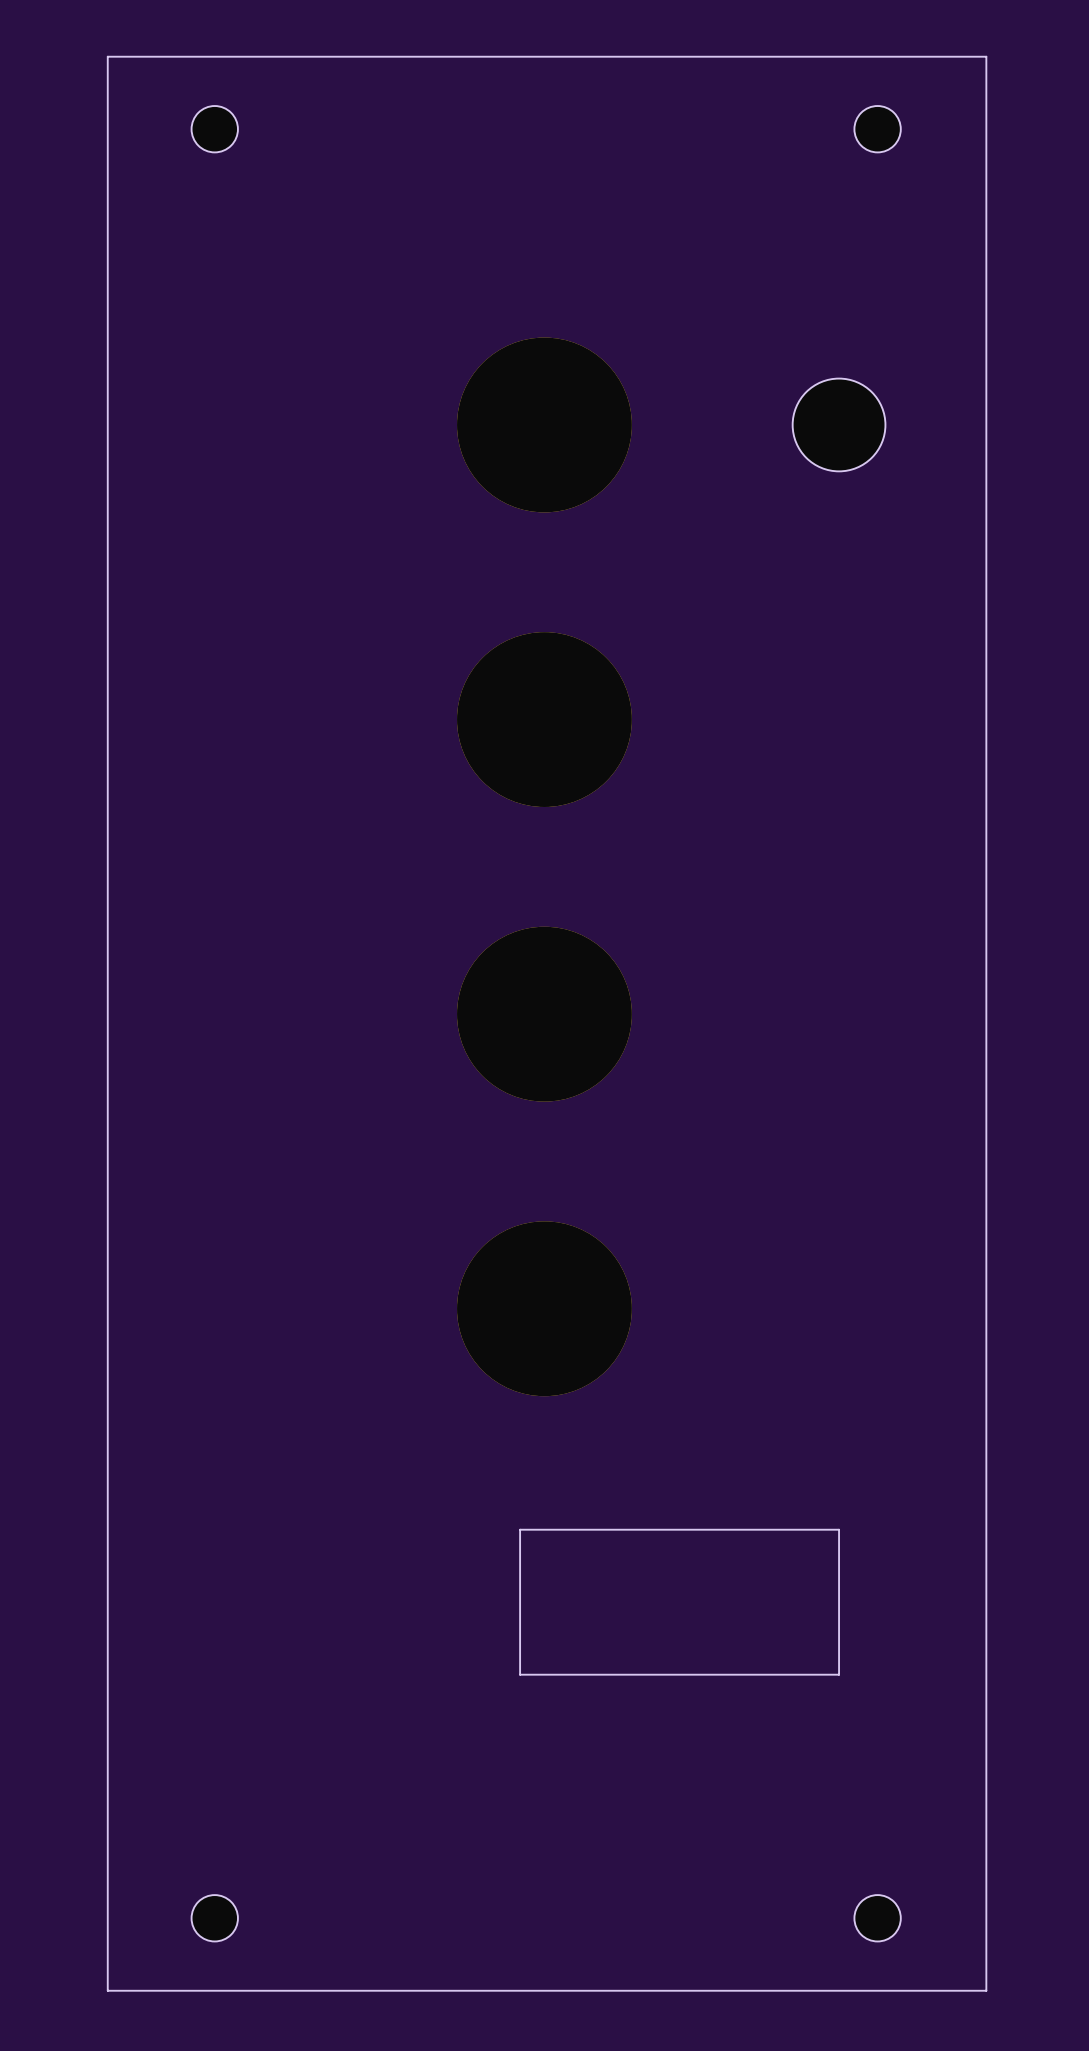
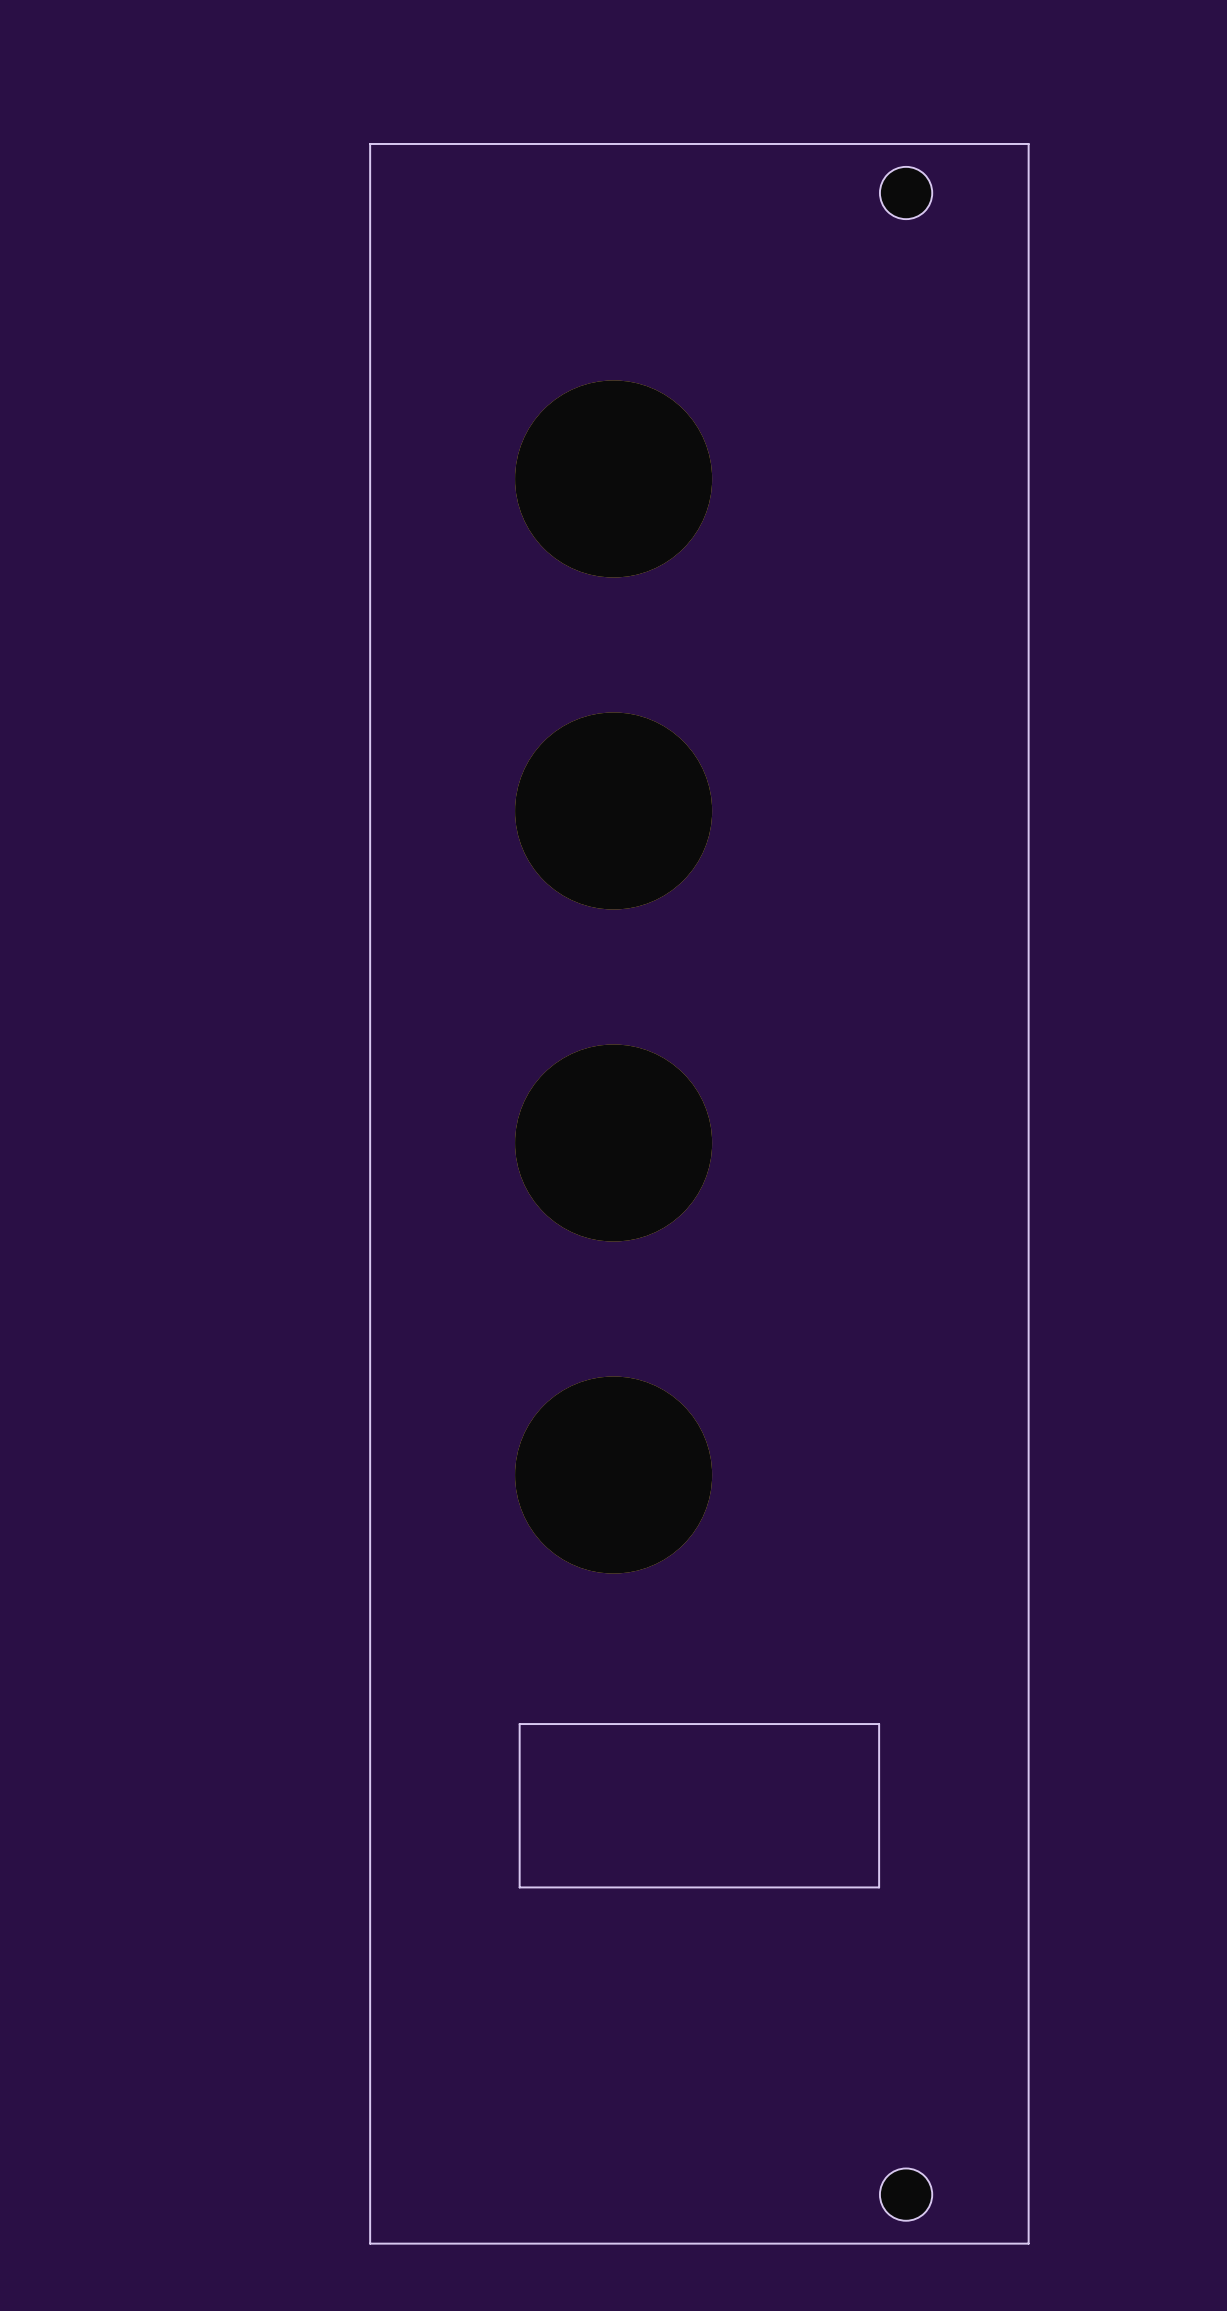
part: (214, 129) -> none
part position: (877, 129) -> (906, 193)
part: (839, 424) -> none
board edge: (520, 1529) (520, 1674) -> (586, 1724) (519, 1724) (519, 1887) (586, 1887)
board edge: (780, 1529) (839, 1529) (839, 1674) (780, 1674) -> (879, 1724) (879, 1887)
part: (214, 1918) -> none
part position: (877, 1918) -> (906, 2194)
board edge: (912, 1990) (986, 1990) (986, 56) (107, 56) (107, 1990) (328, 1990) -> (1028, 2243) (1028, 143) (370, 143) (370, 2243)

